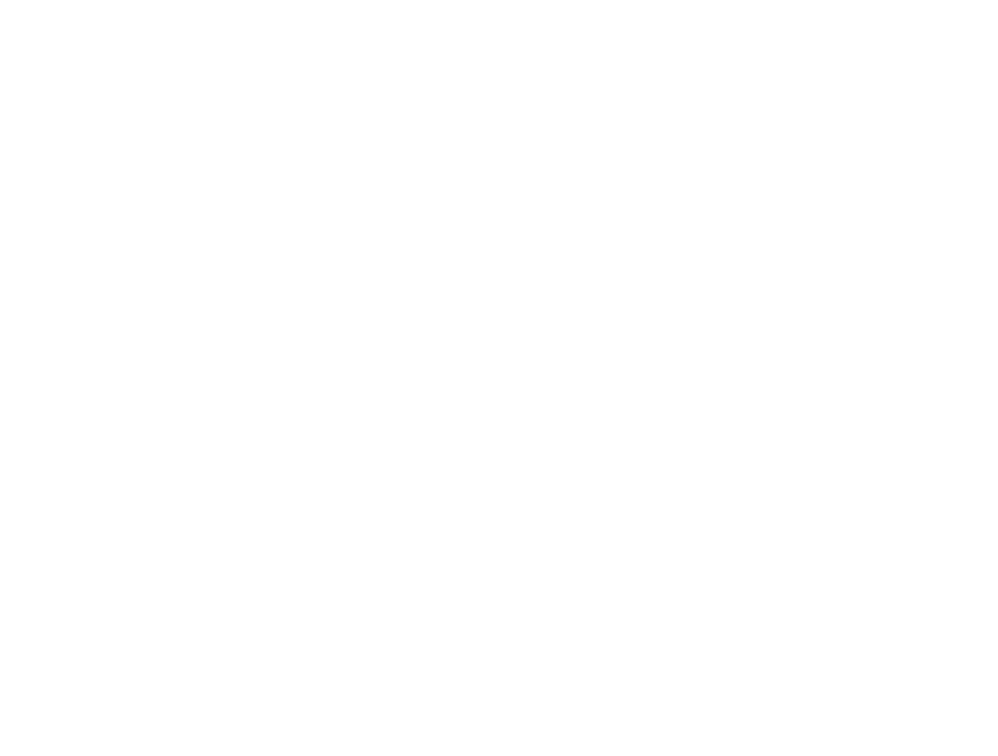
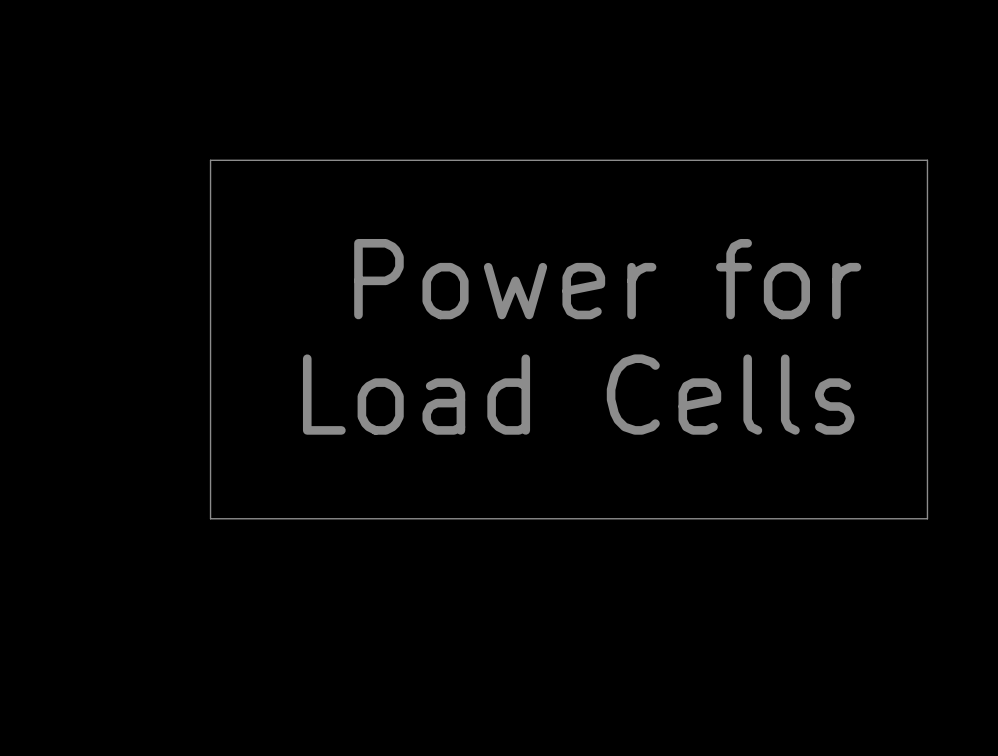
line: none -> (210, 160) (927, 160) (927, 518) (210, 518) (210, 160)
text: none -> Power for (607, 279)
text: none -> Load Cells (578, 394)

